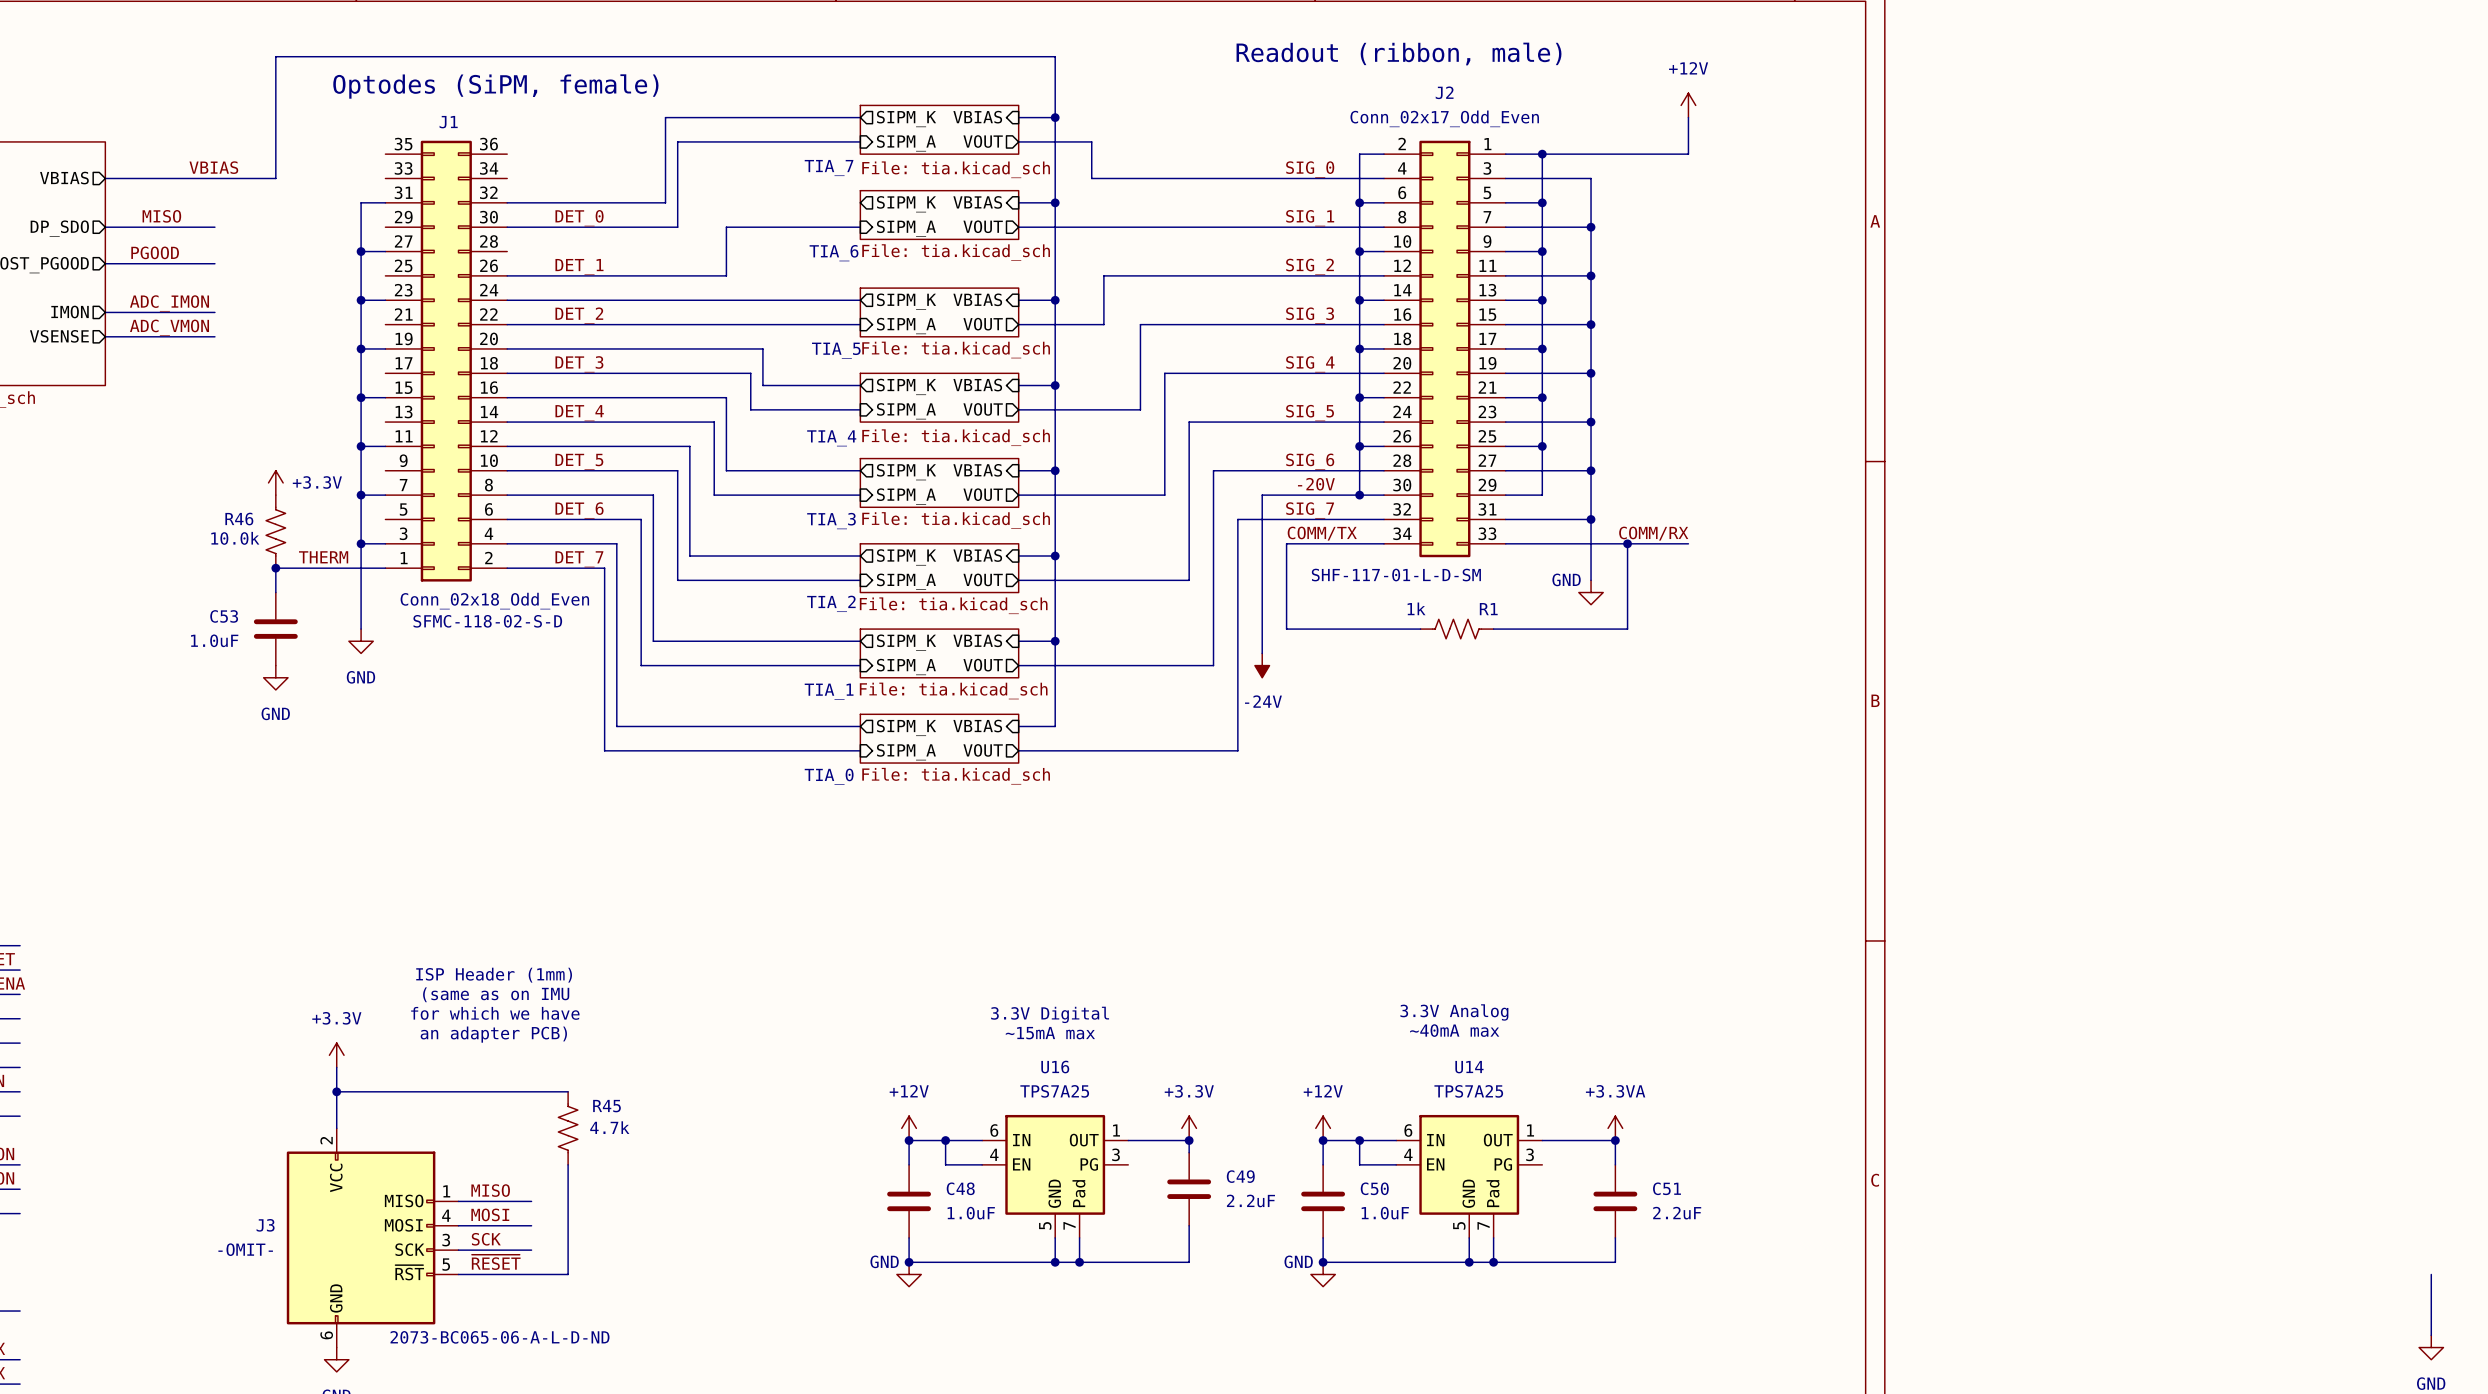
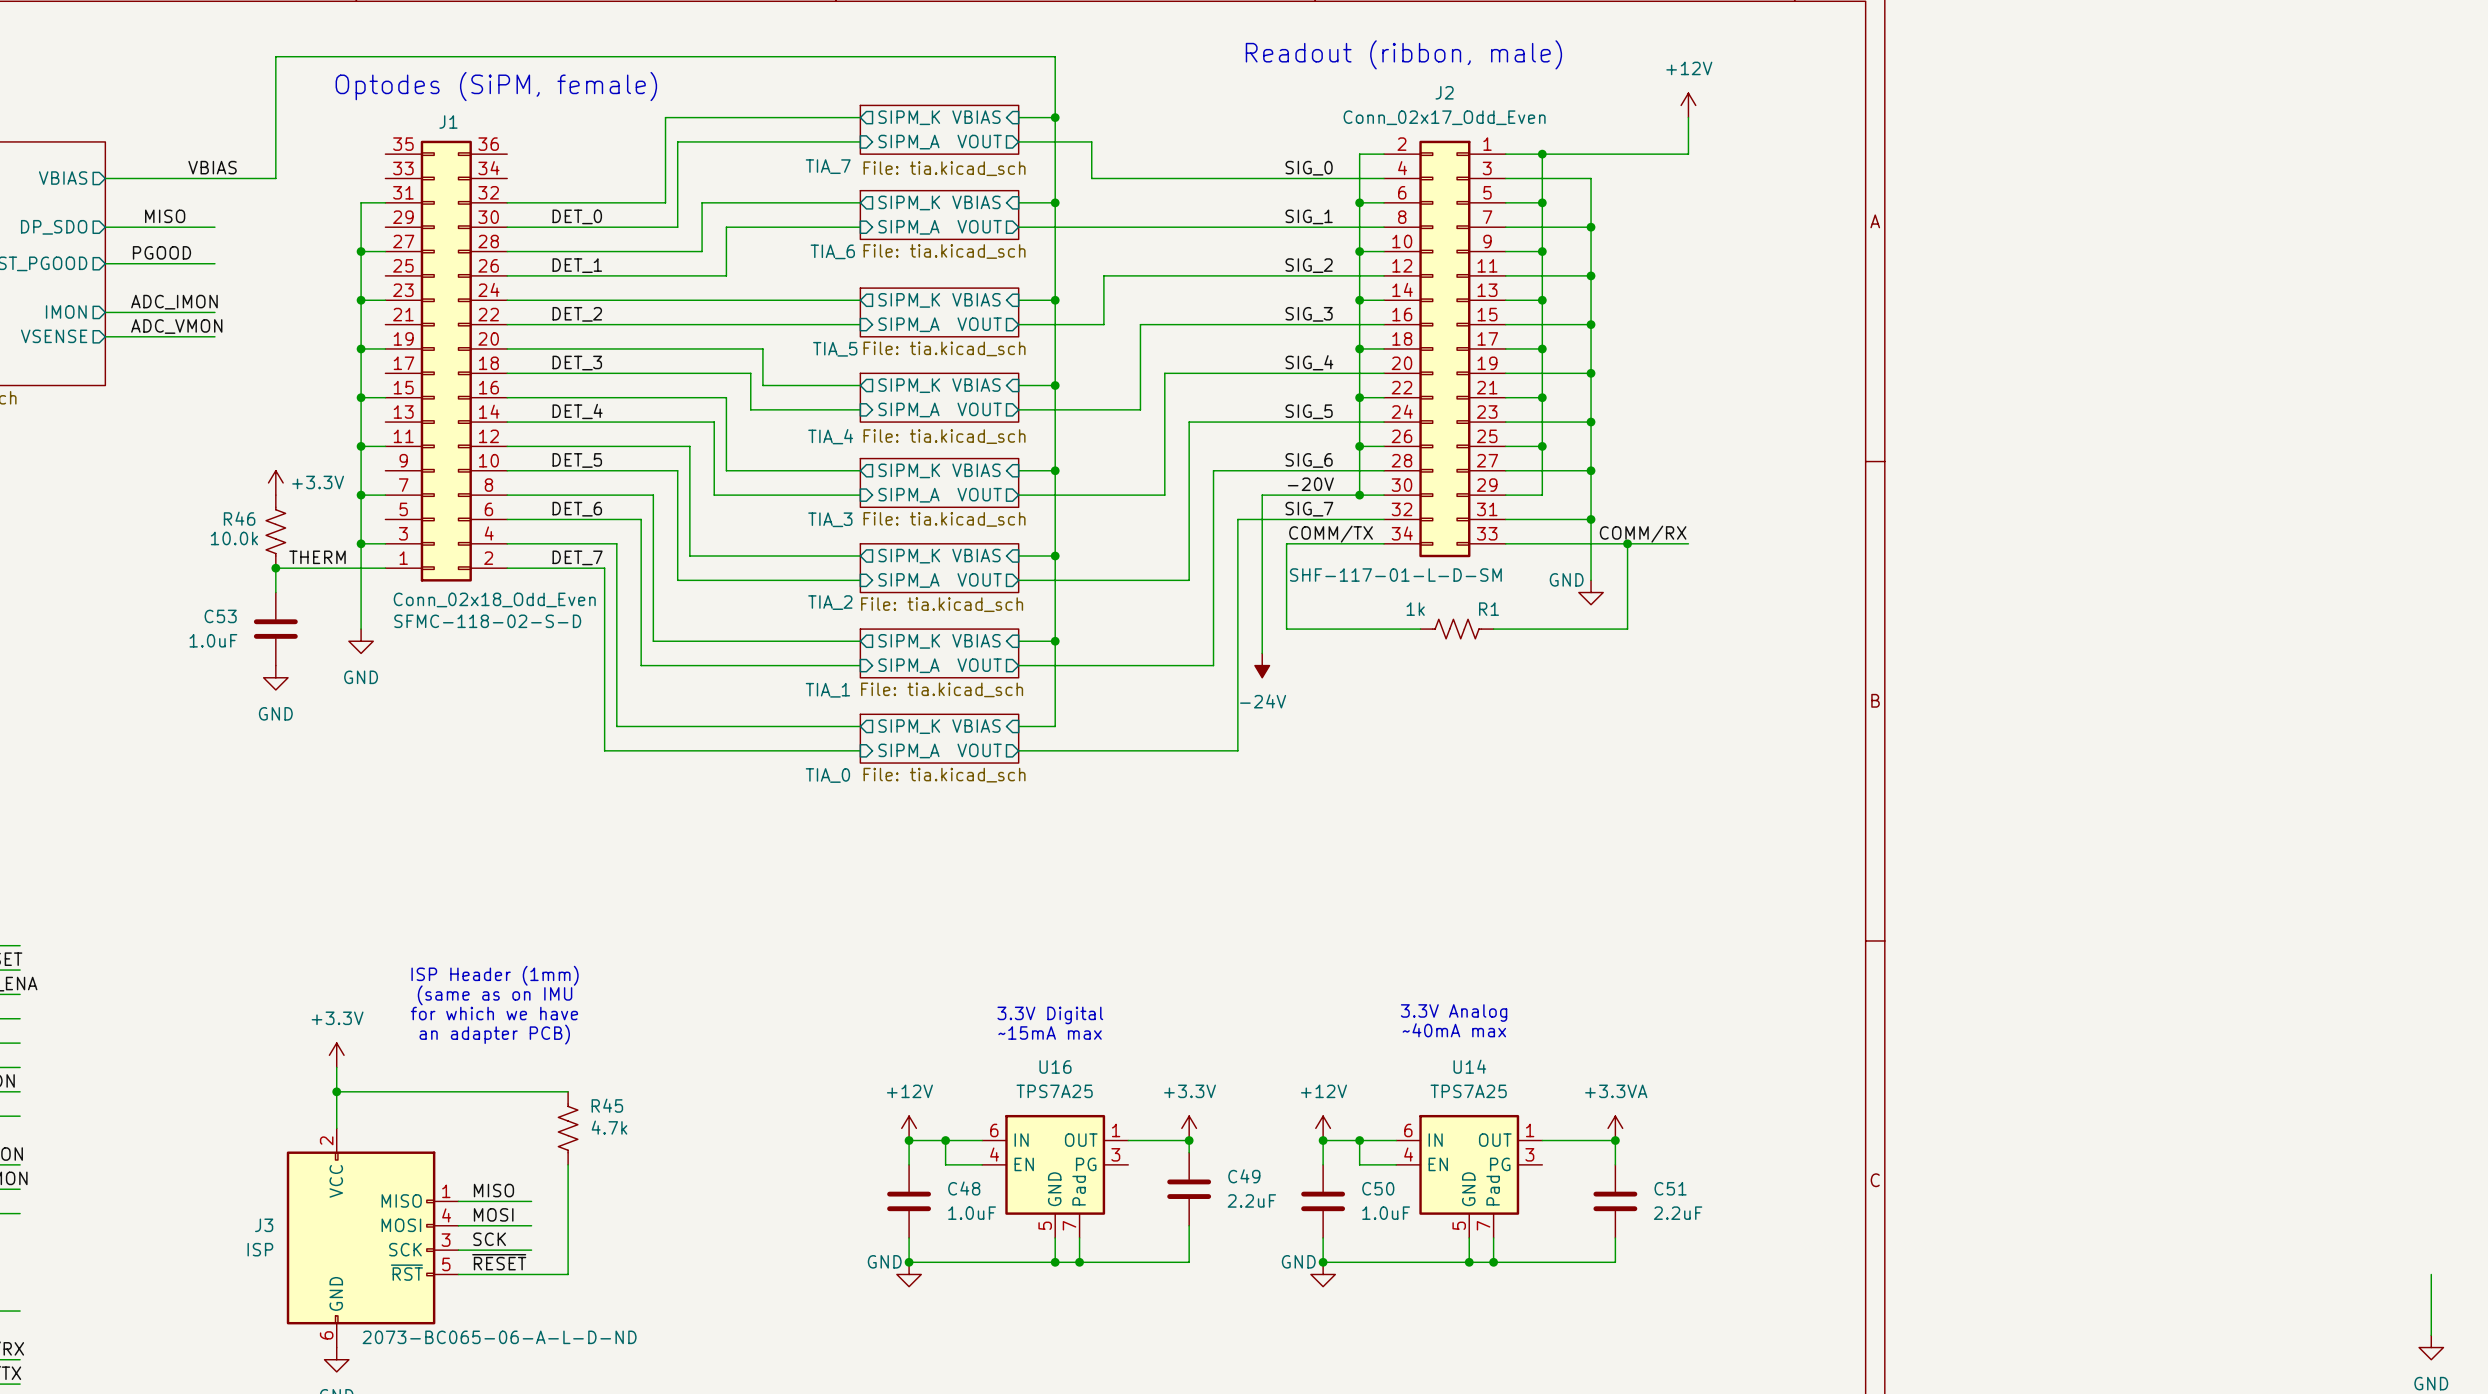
wire: none -> (860, 202) (702, 202) (702, 251) (507, 251)
J3 value: -OMIT- (245, 1249) -> ISP (260, 1249)

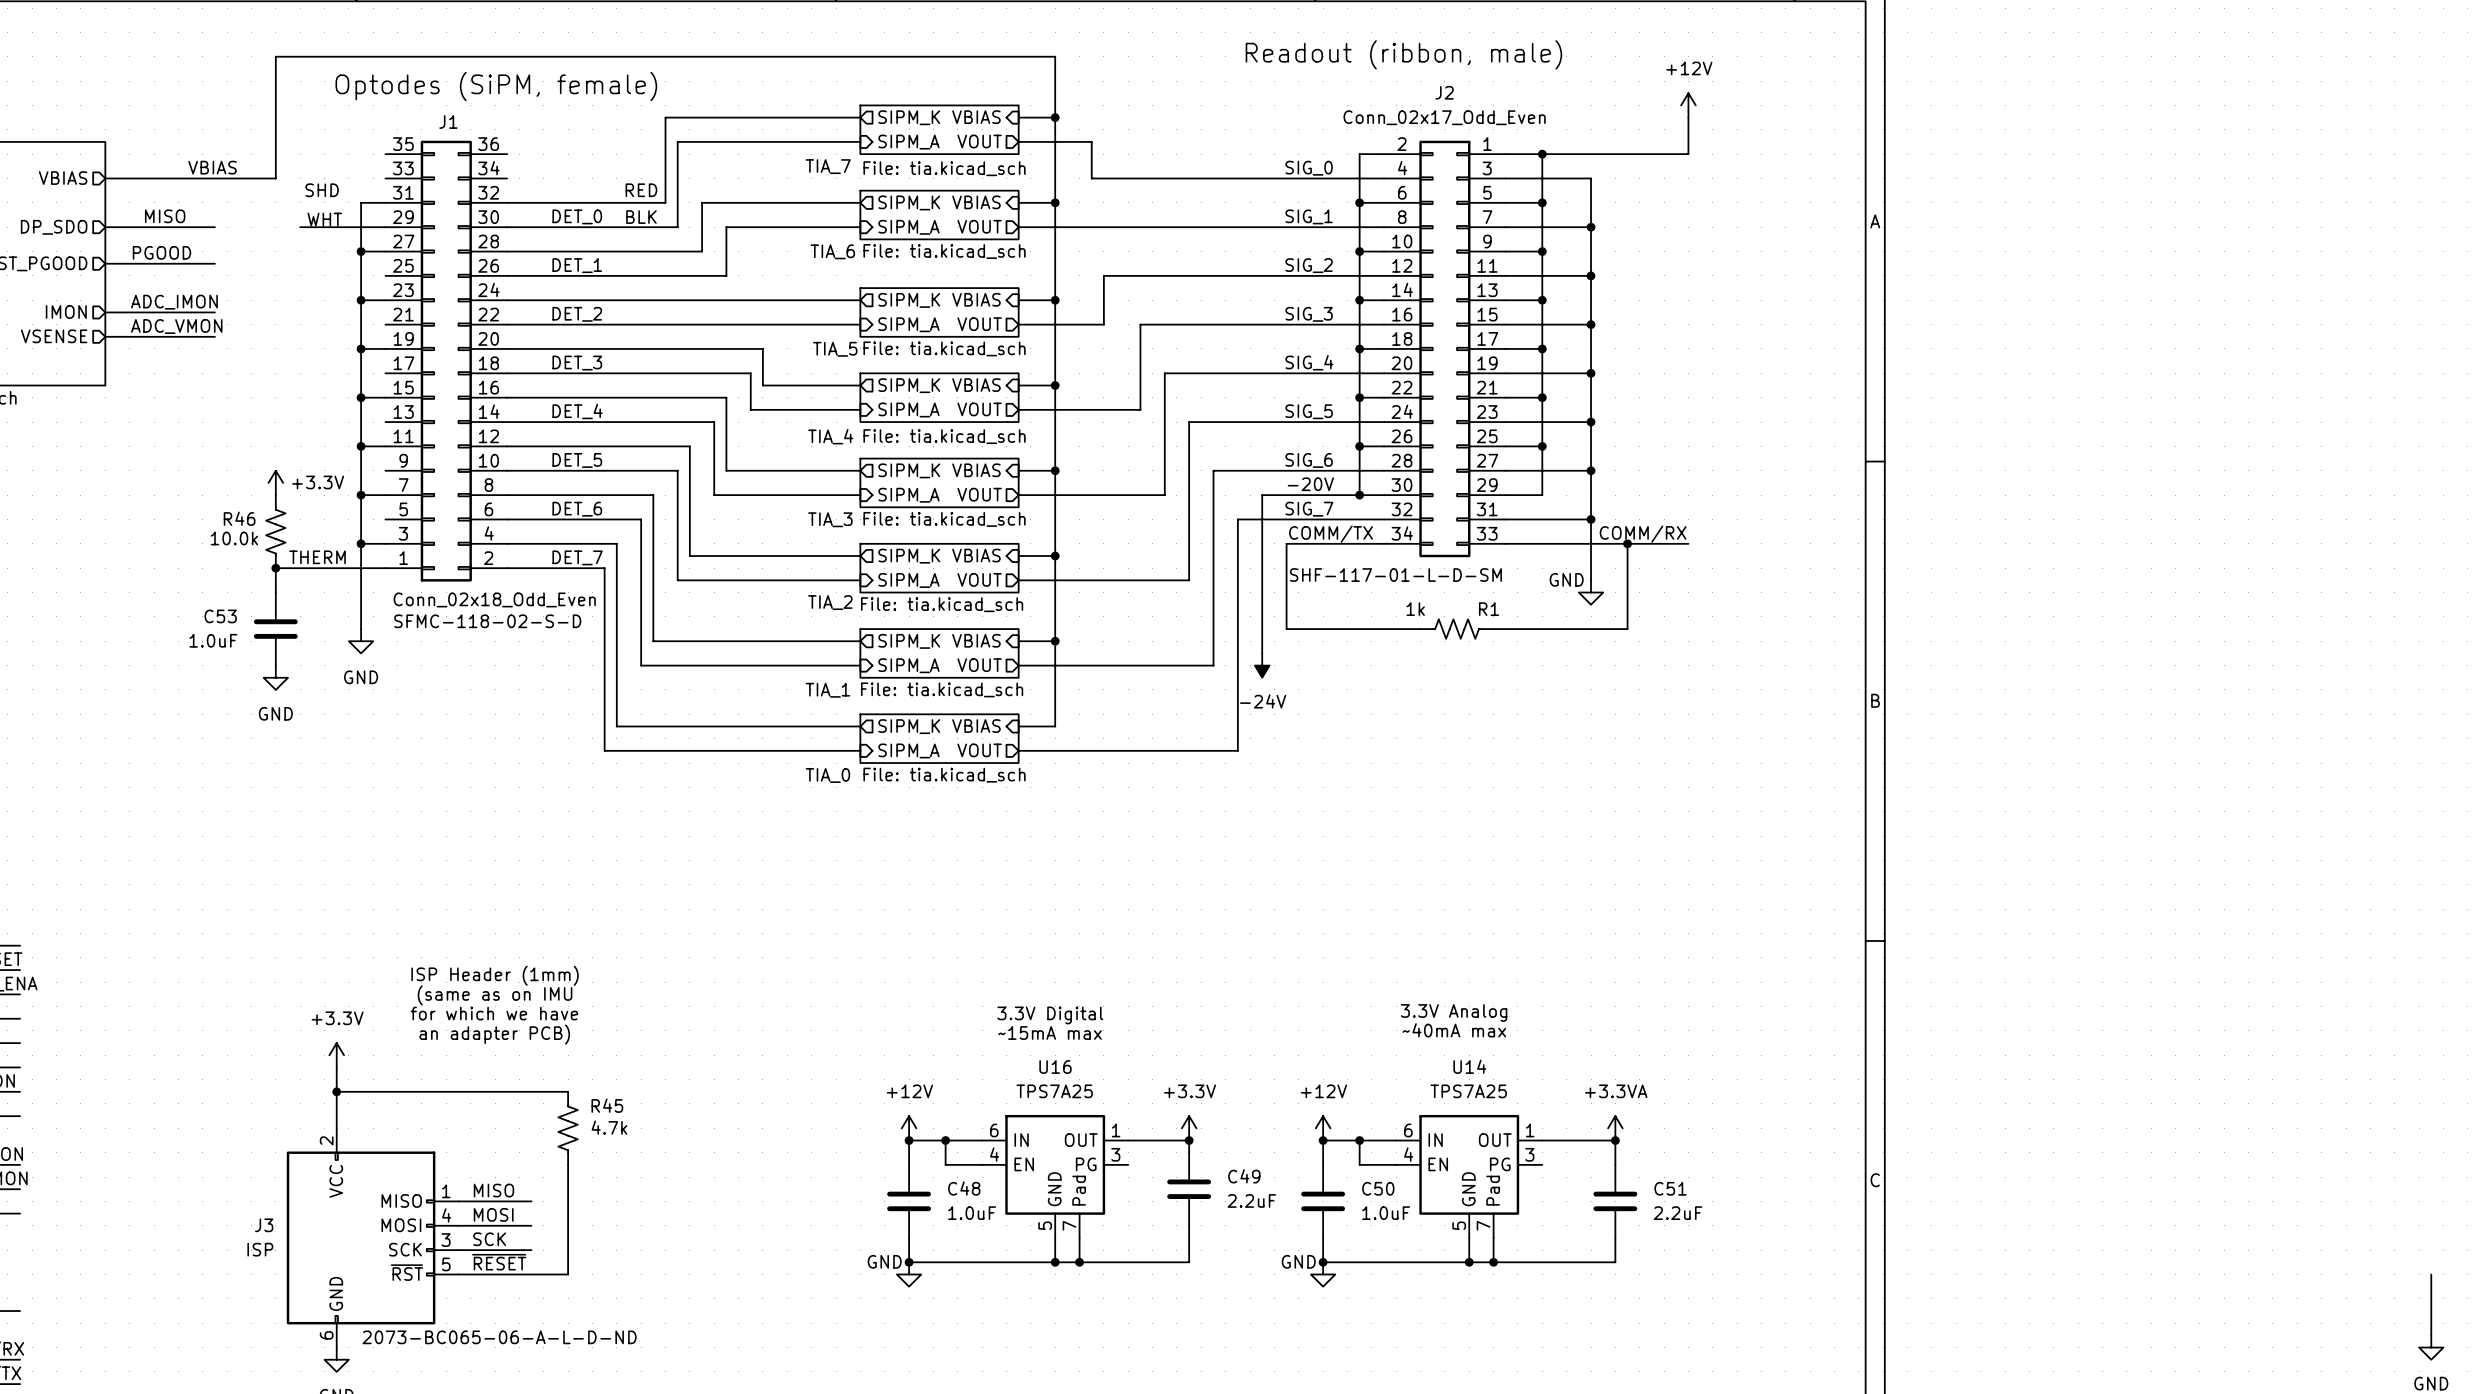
text: none -> SHD (322, 190)
text: none -> RED (641, 190)
text: none -> BLK (641, 217)
text: none -> WHT (324, 219)
wire: none -> (300, 227) (385, 227)

